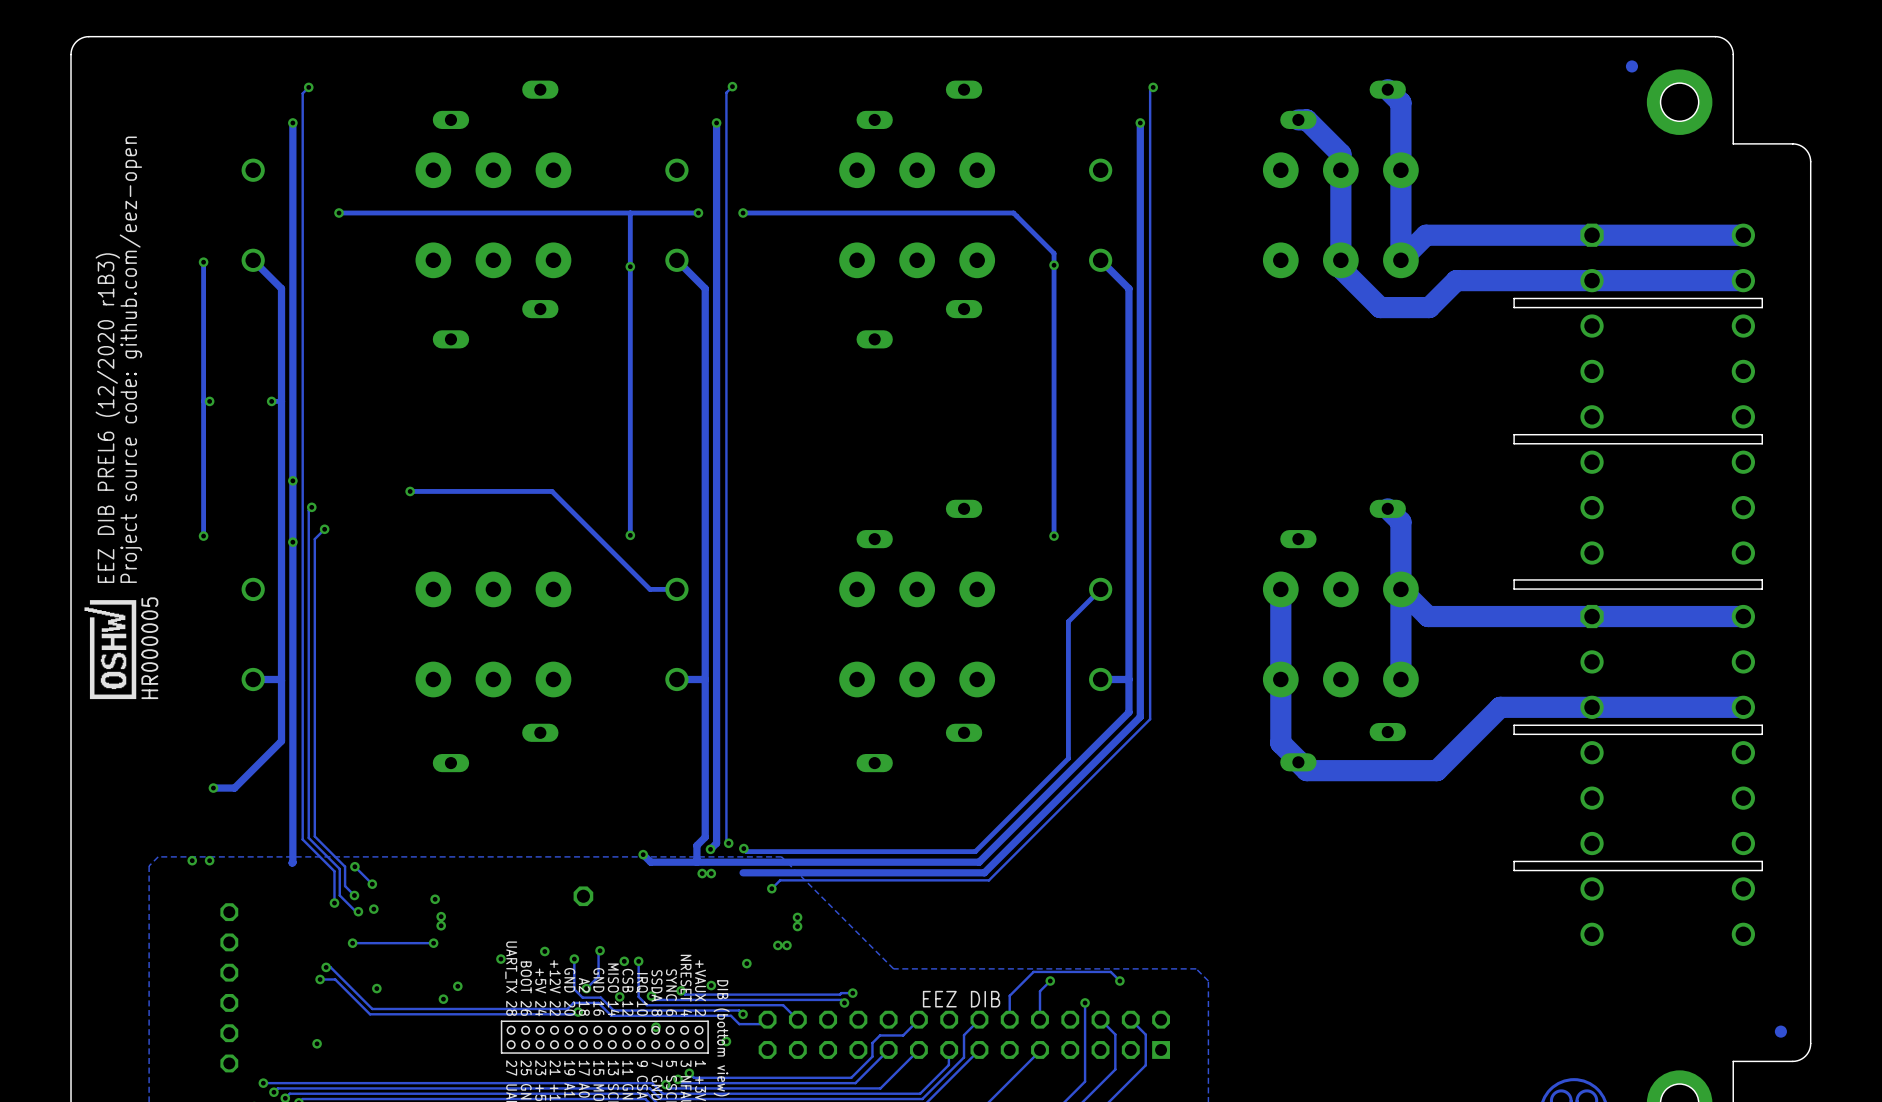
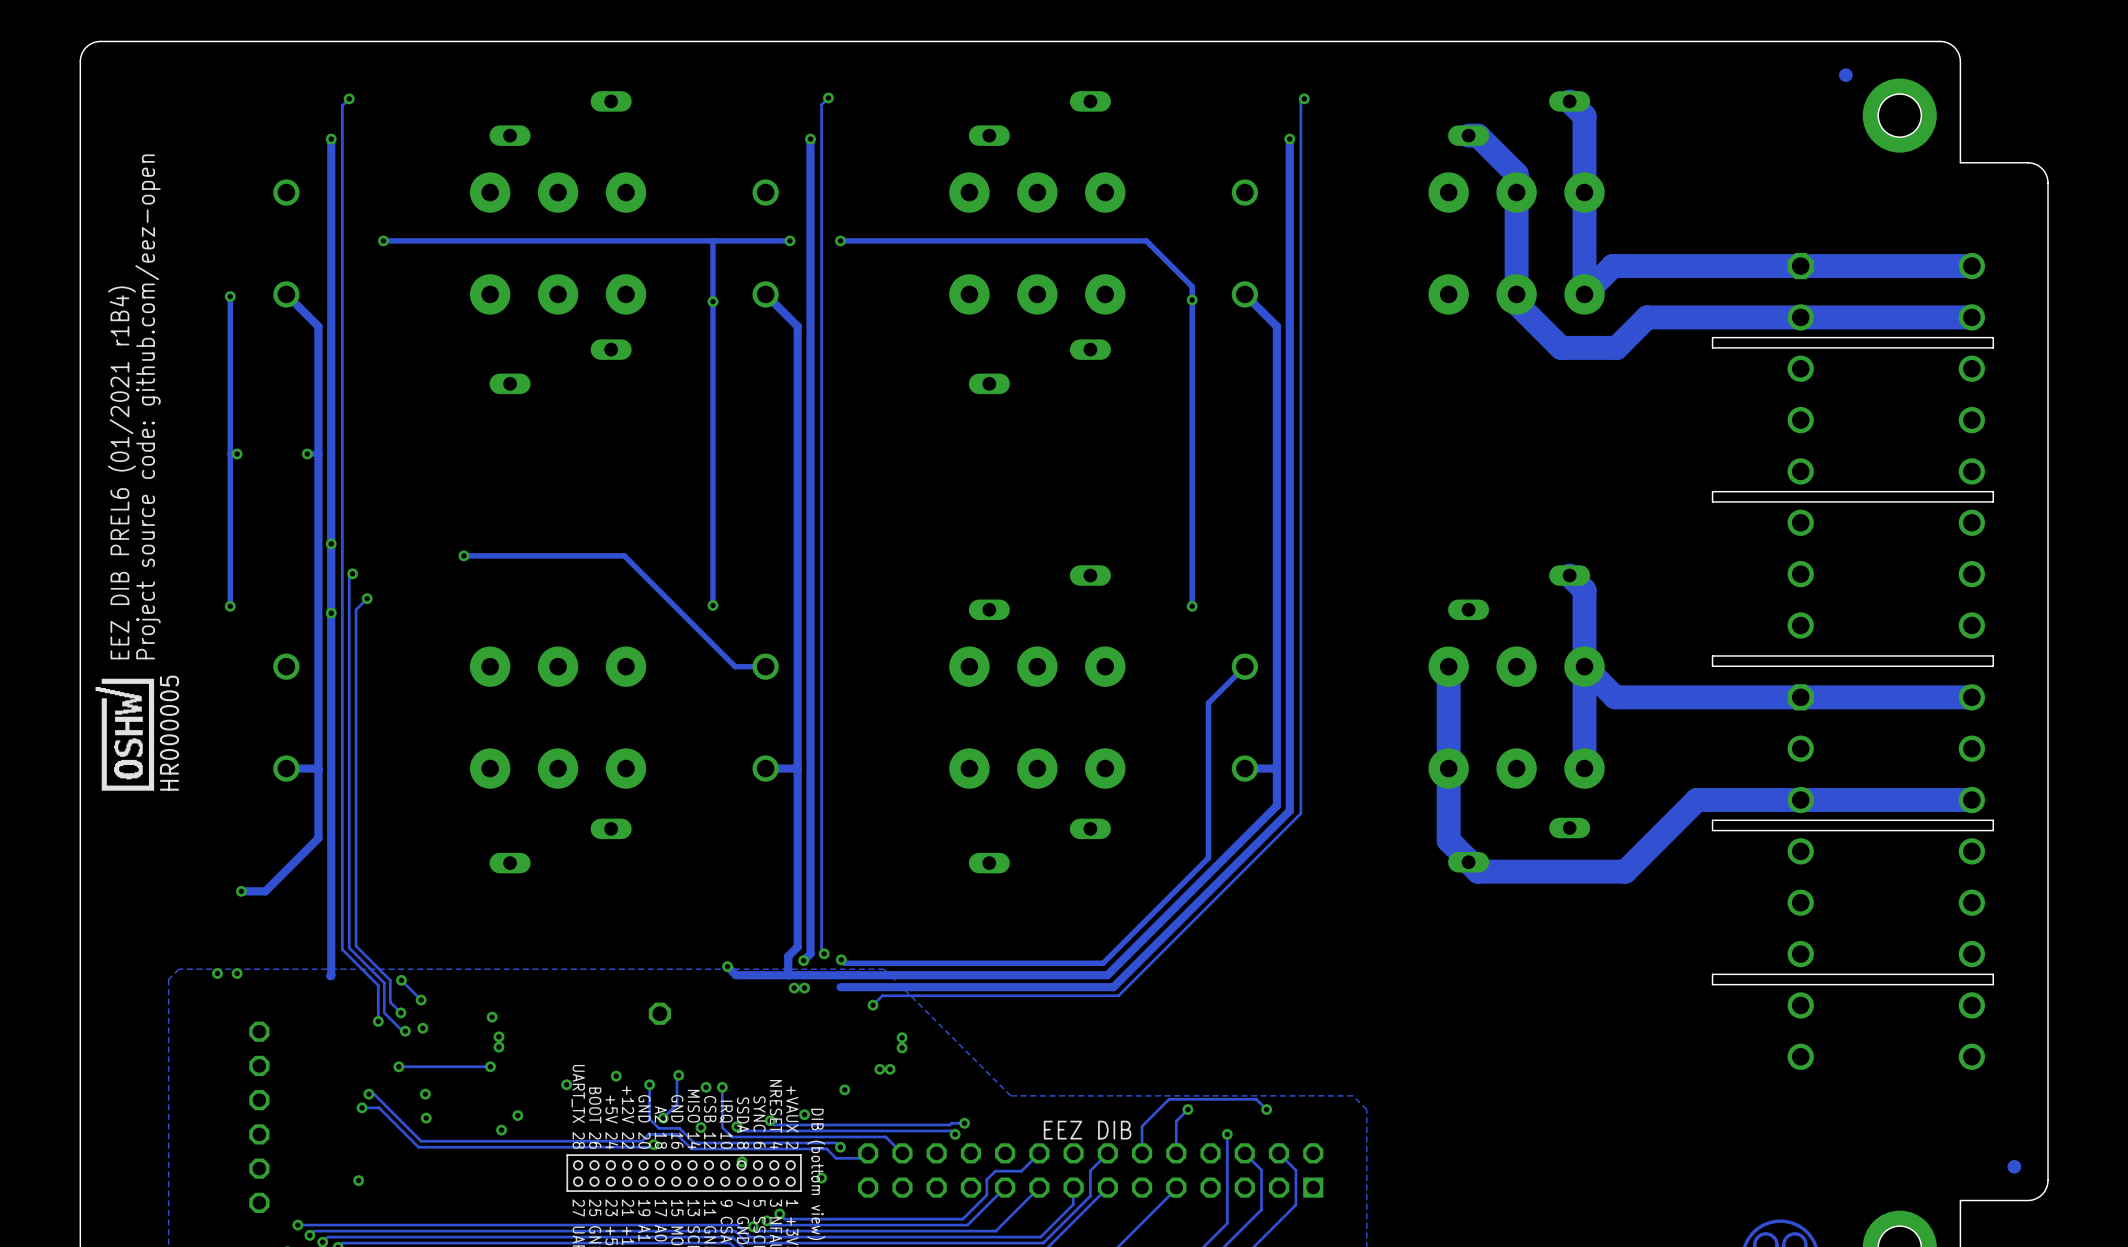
text: EEZ DIB PREL6 (12/2020 r1B3) (107, 418) -> EEZ DIB PREL6 (01/2021 r1B4) (121, 472)
via: none -> (425, 1094)

